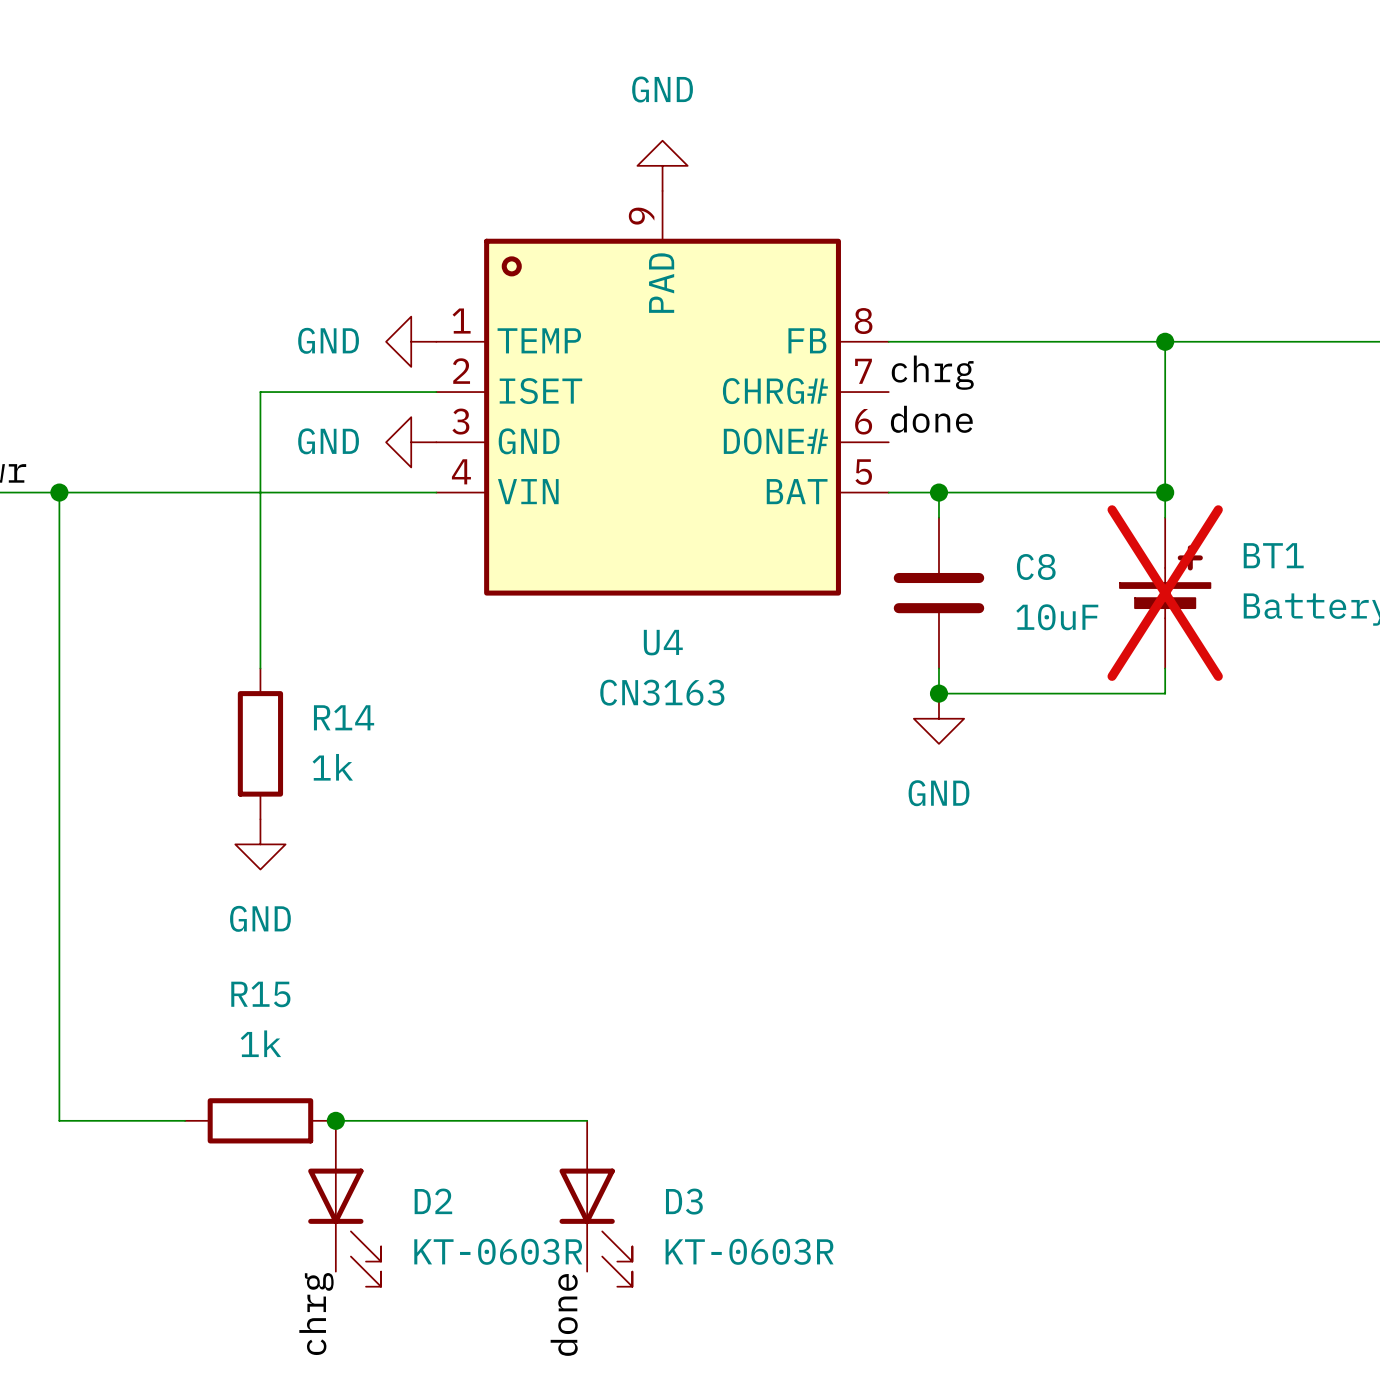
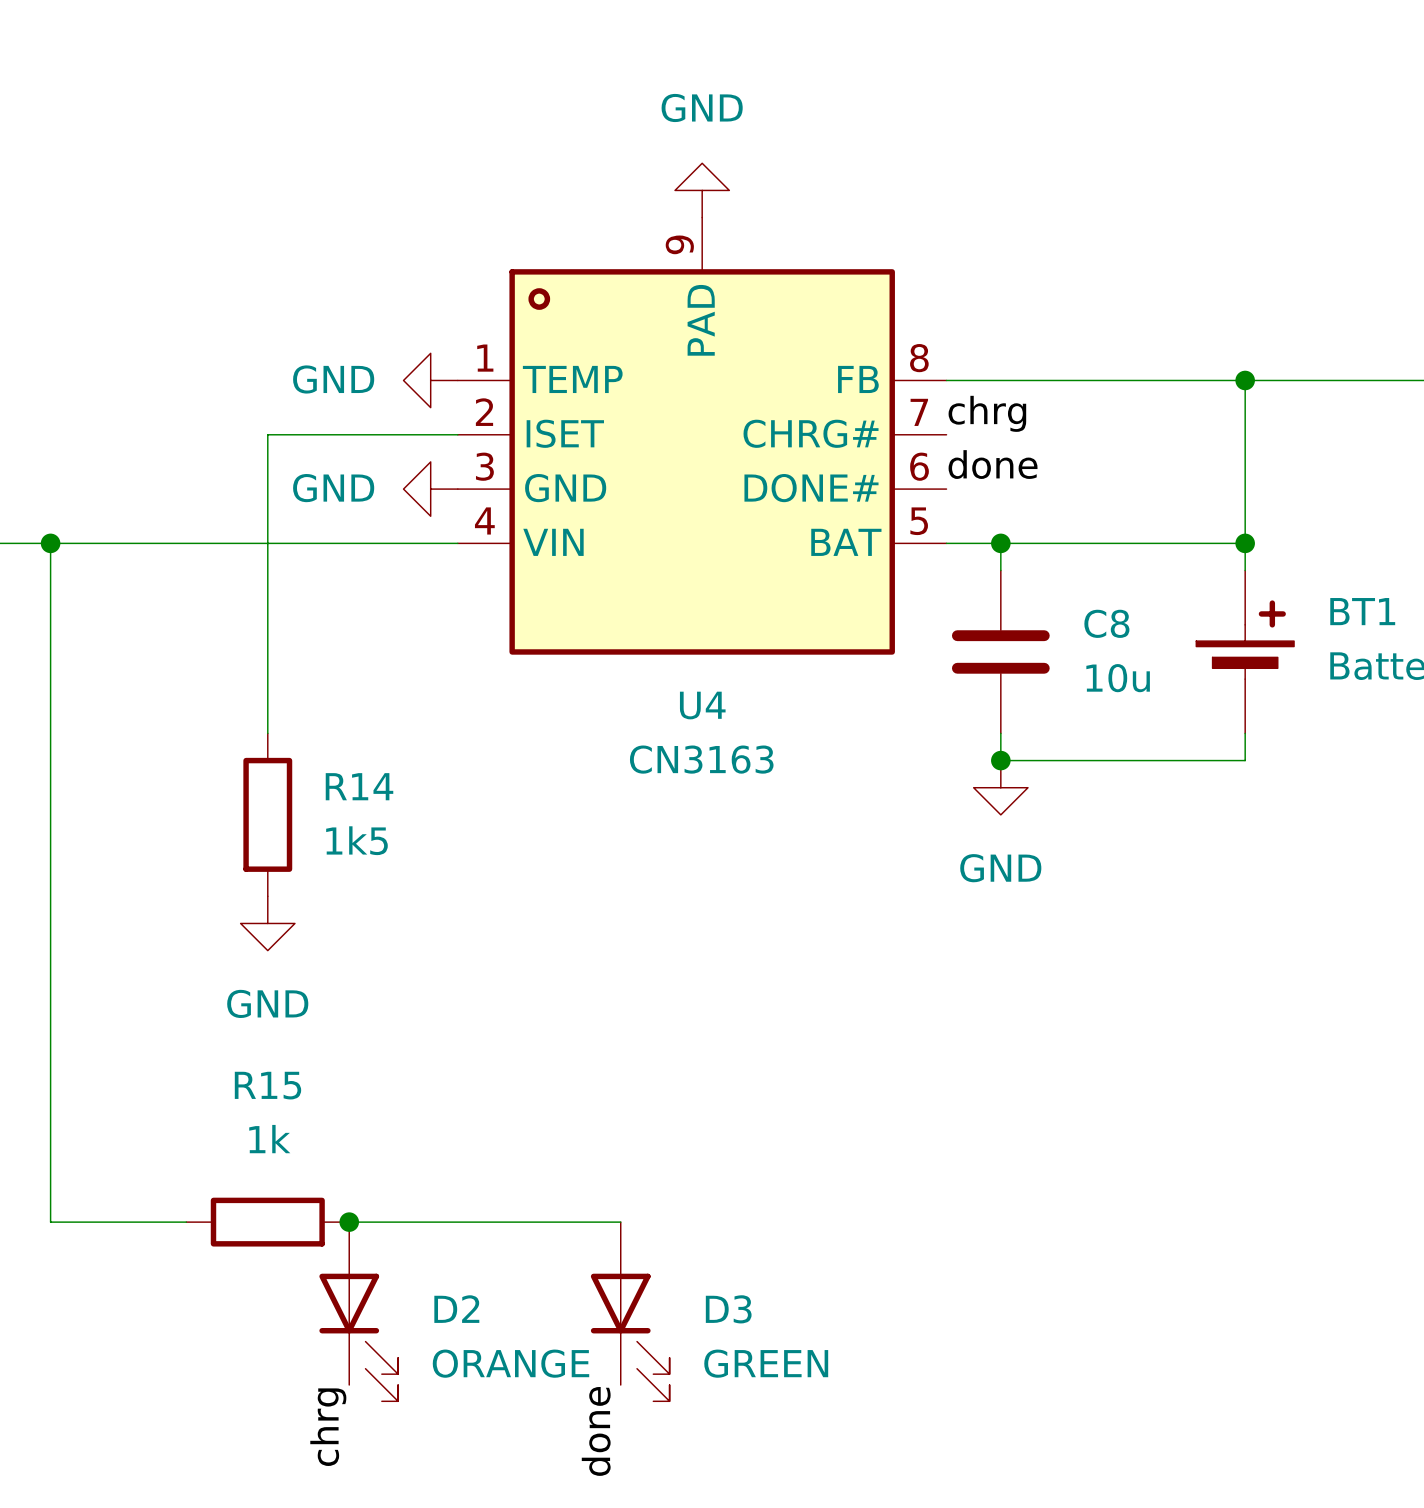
BT1 do-not-place cross: (1165, 593) -> none
C8 value: 10uF (1057, 617) -> 10u (1118, 678)
R14 value: 1k (332, 767) -> 1k5 (356, 840)
D2 value: KT-0603R (498, 1251) -> ORANGE (510, 1363)
D3 value: KT-0603R (749, 1251) -> GREEN (766, 1363)

